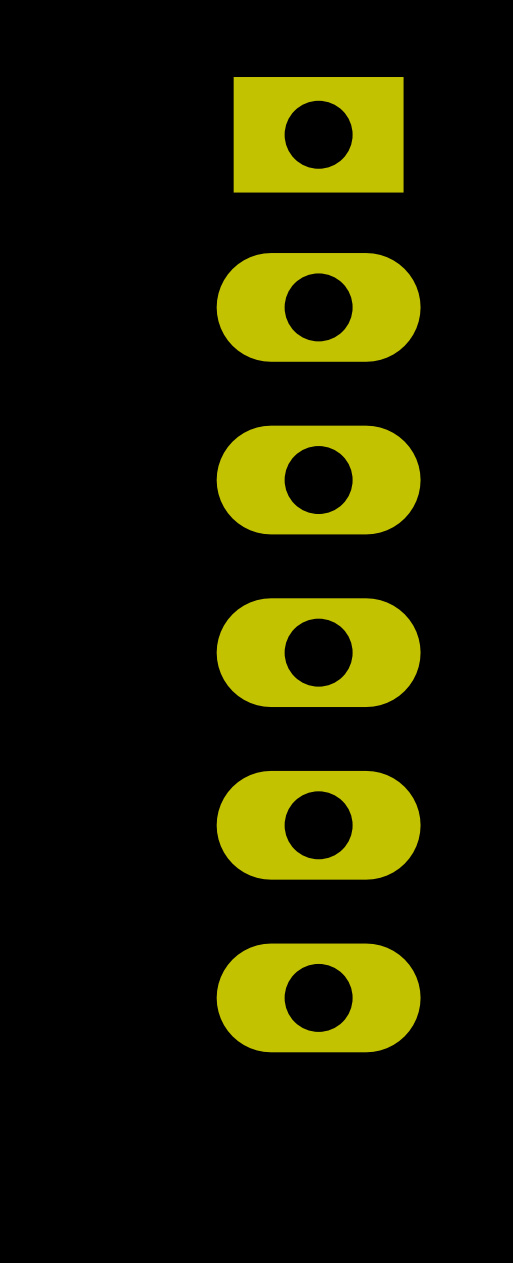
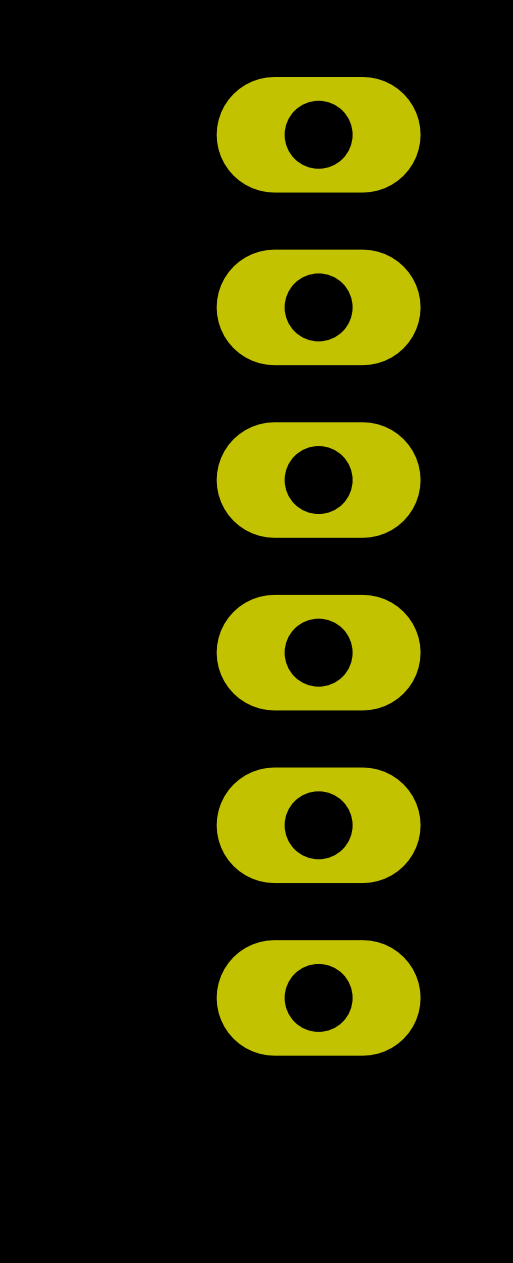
part footprint: [216, 77, 421, 1053] -> [216, 77, 421, 1056]

